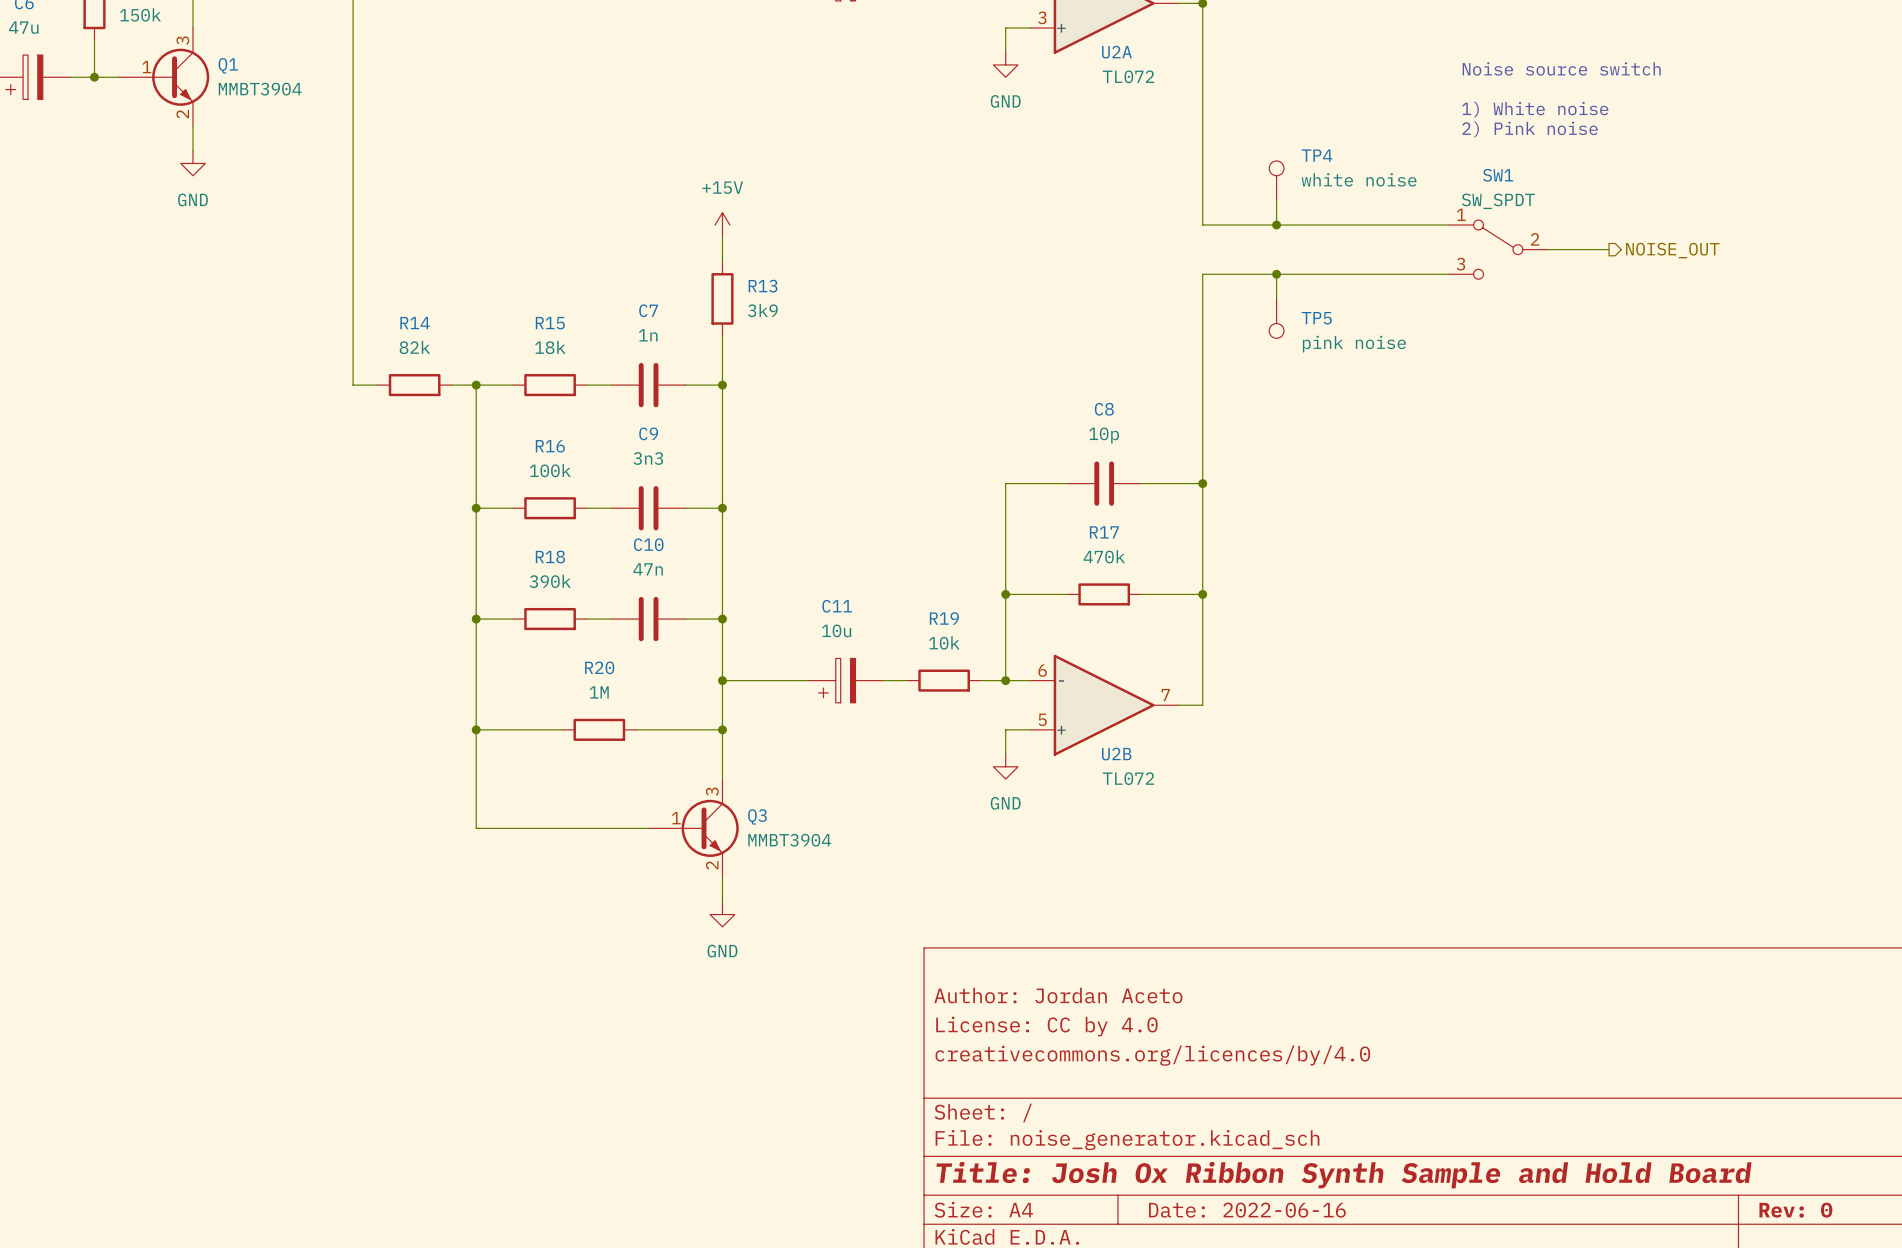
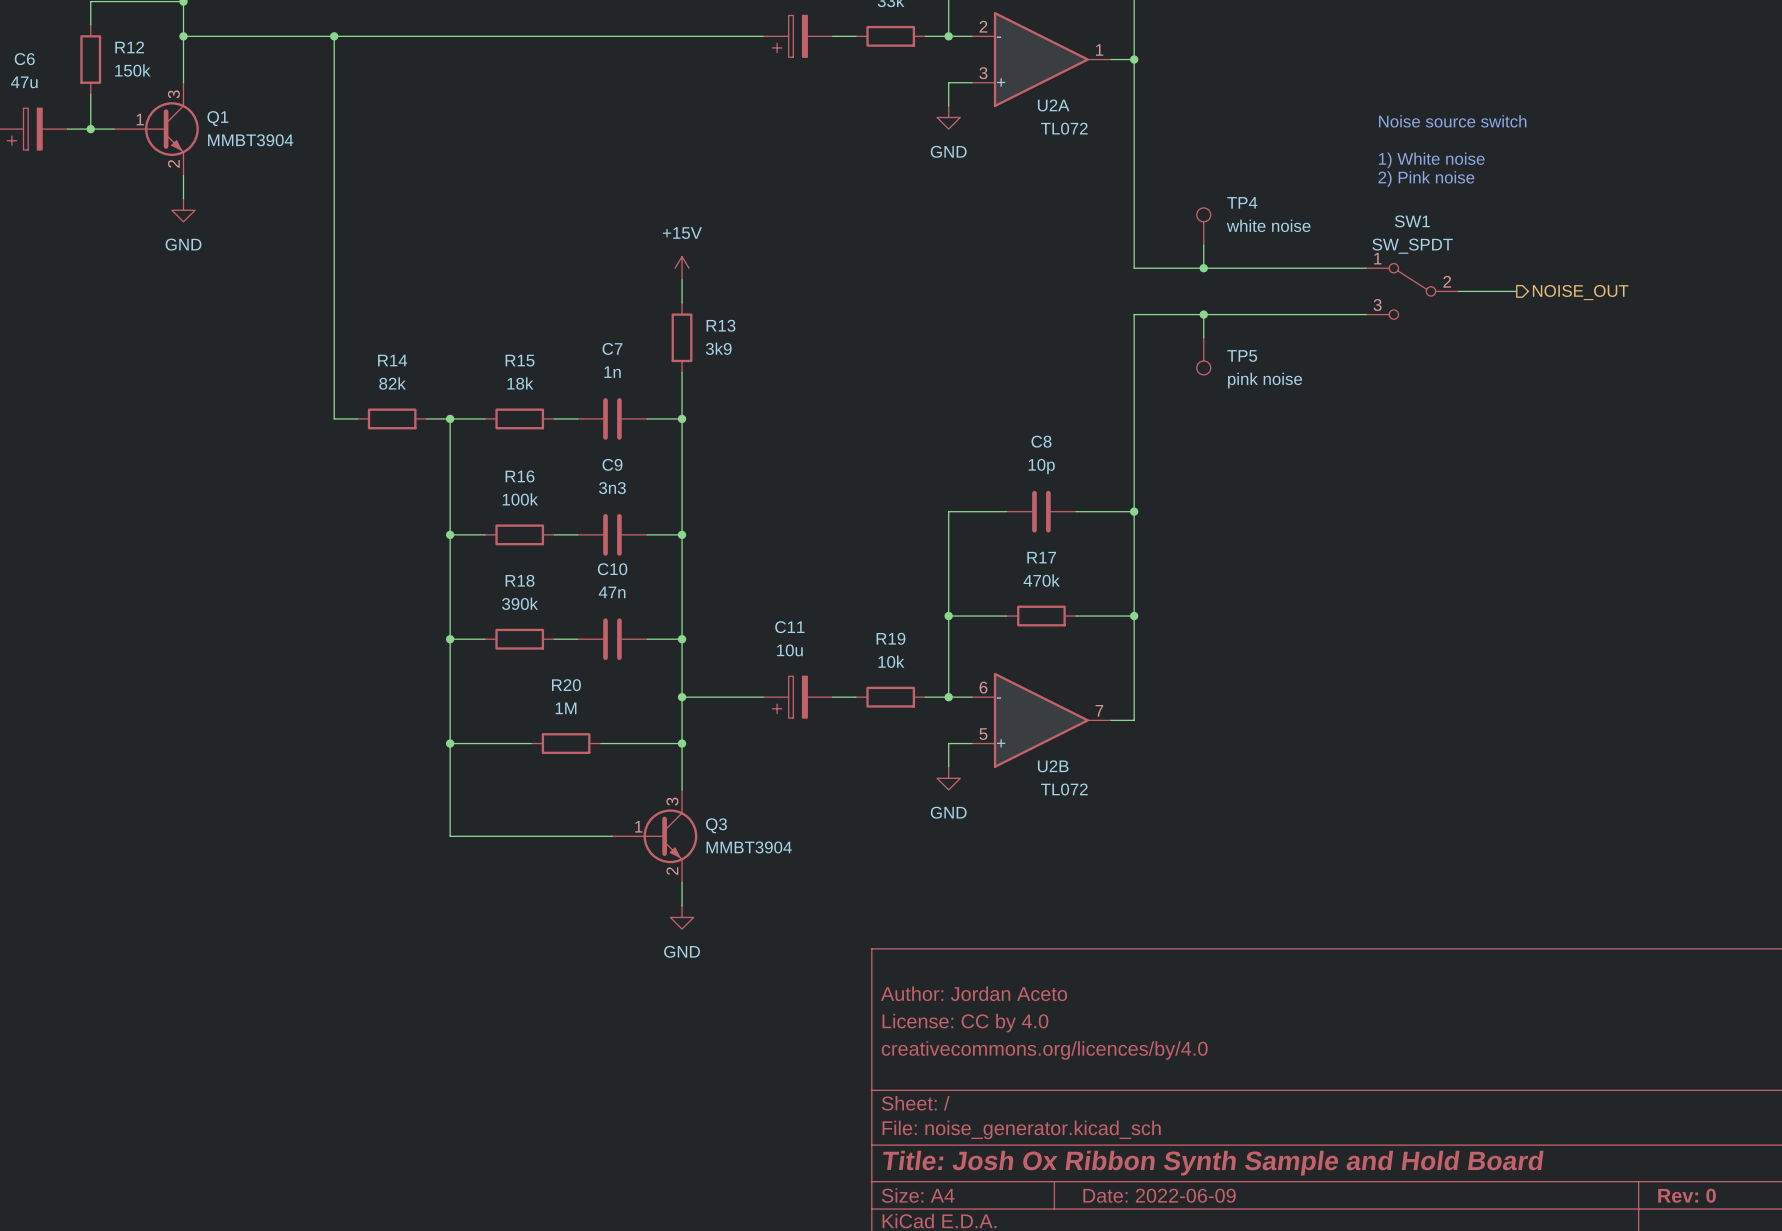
title block: Date: 2022-06-16 (1247, 1210) -> Date: 2022-06-09 (1159, 1195)

